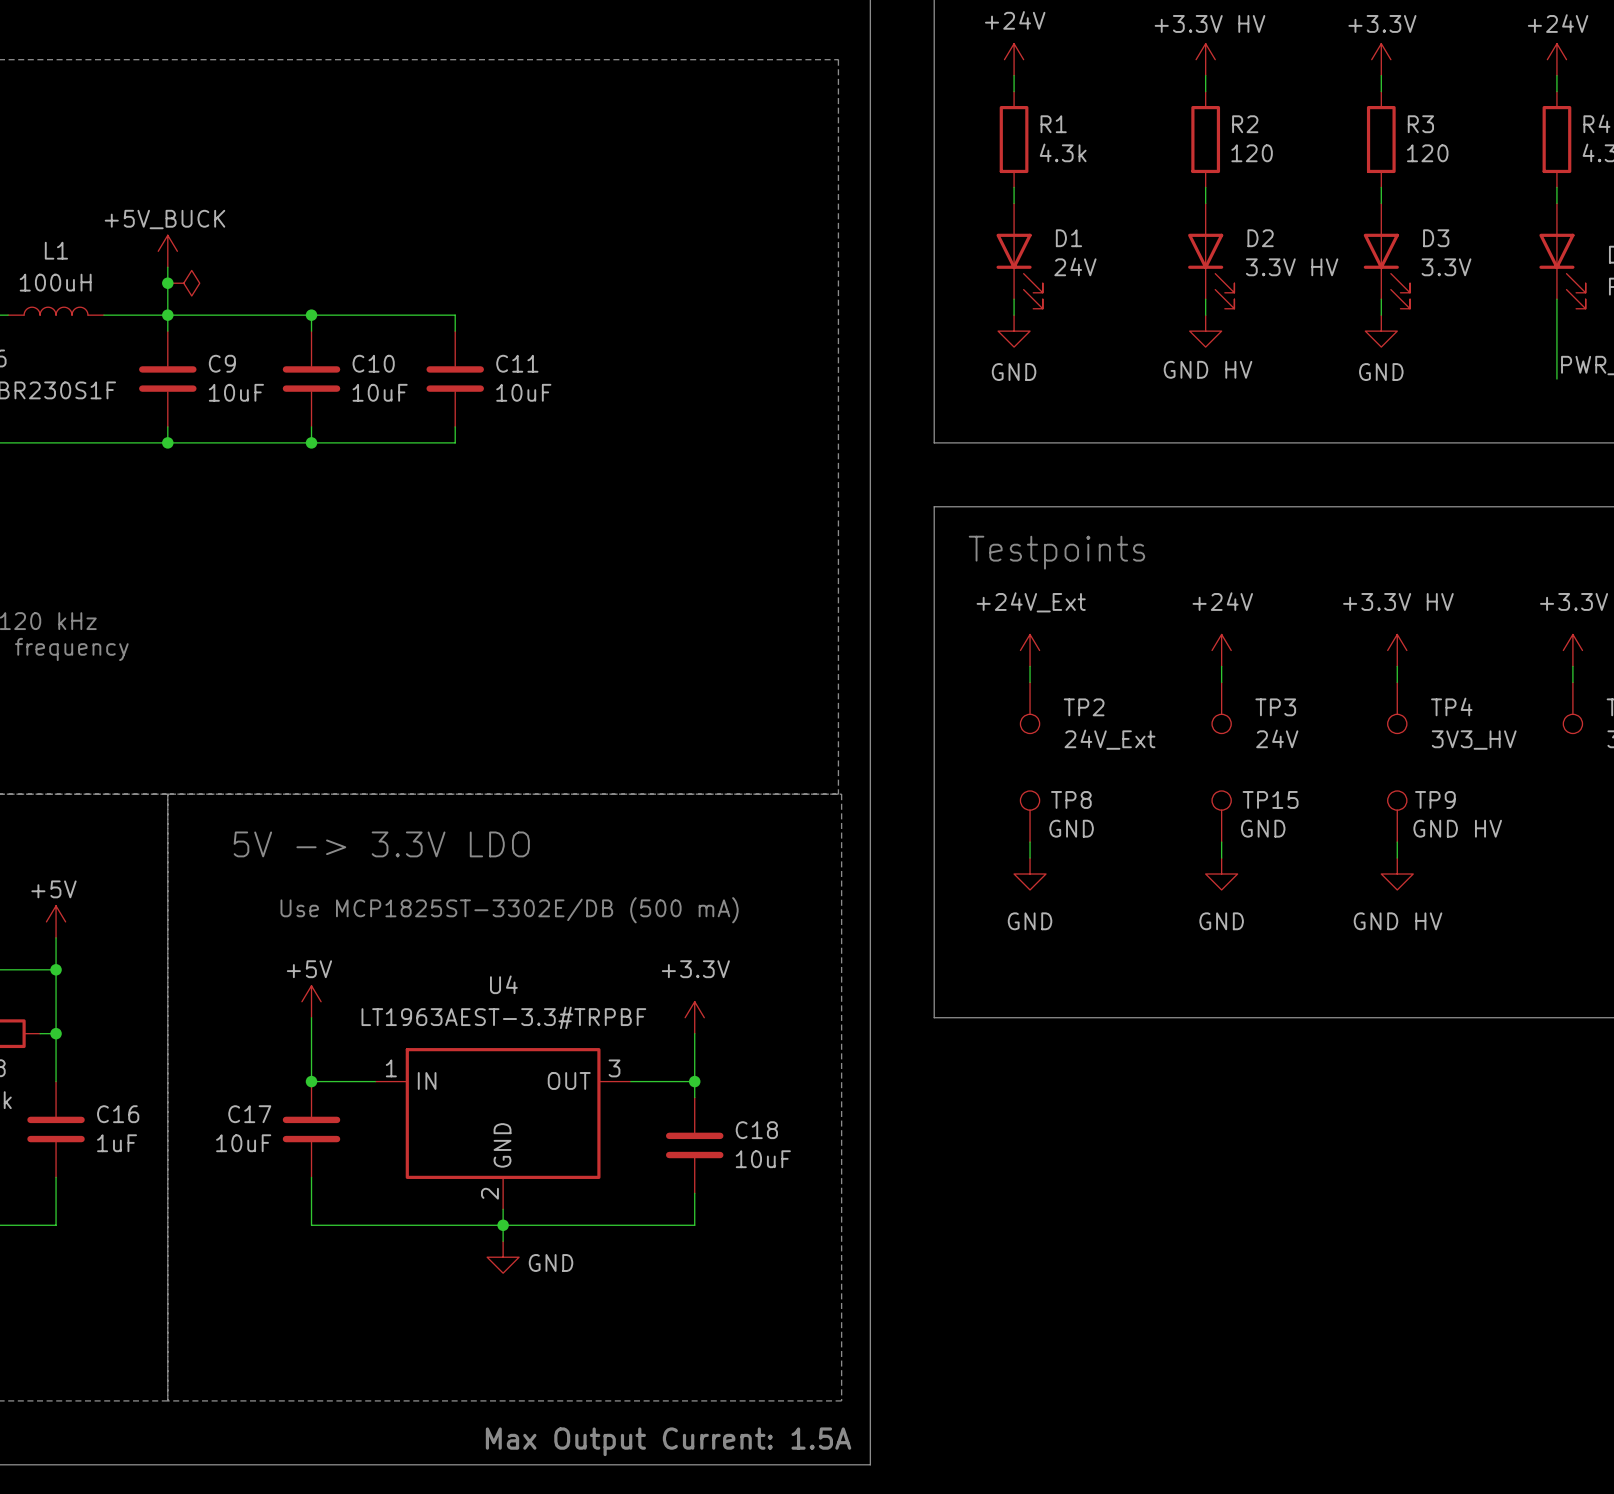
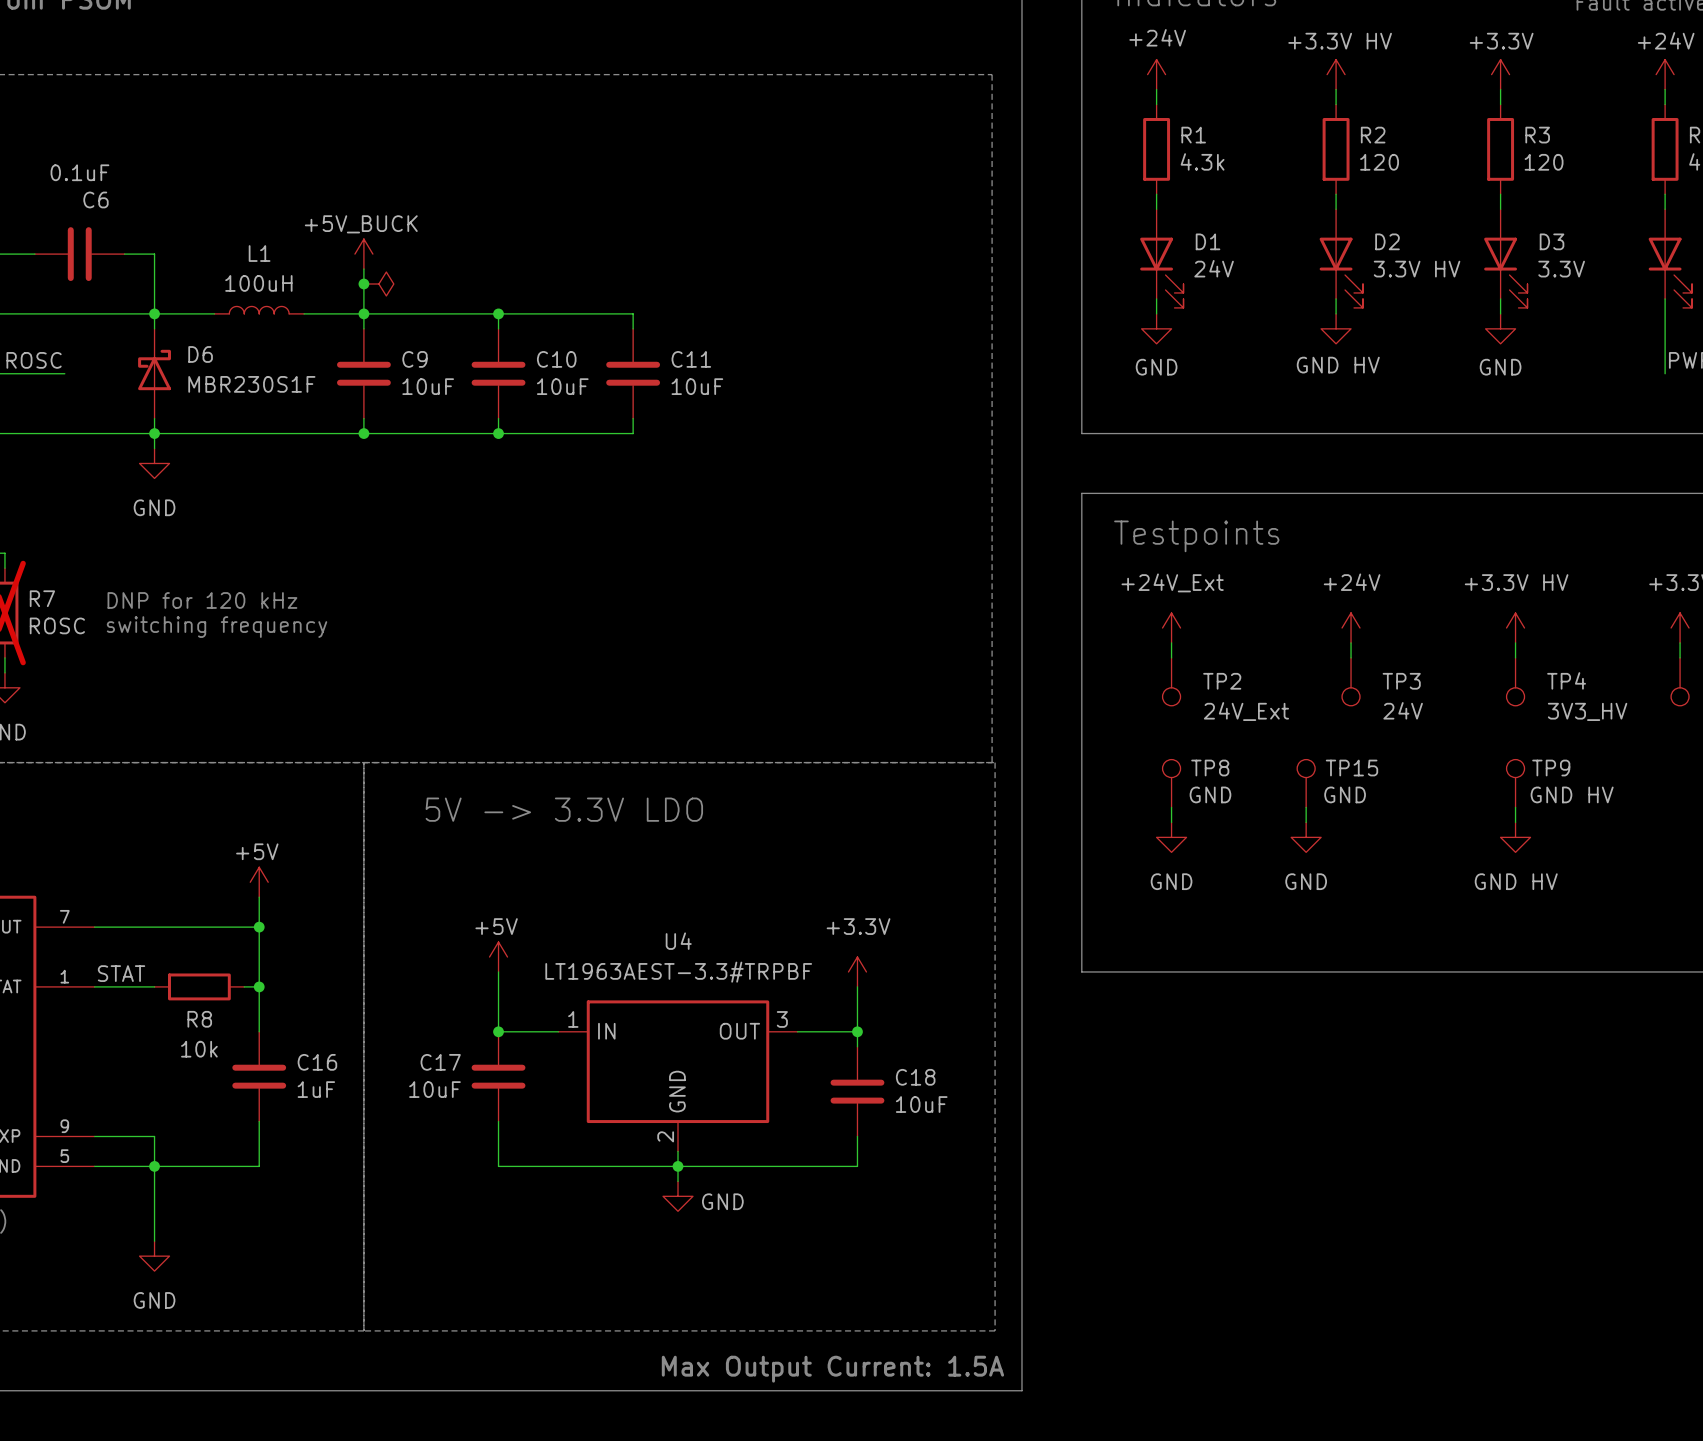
TP15 position: (1221, 816) -> (1306, 783)
wire: (1221, 842) (1221, 858) -> (1306, 807) (1306, 822)
power symbol position: GND (1221, 874) -> GND (1306, 837)
text: Use MCP1825ST-3302E/DB (500 mA) (509, 910) -> none

